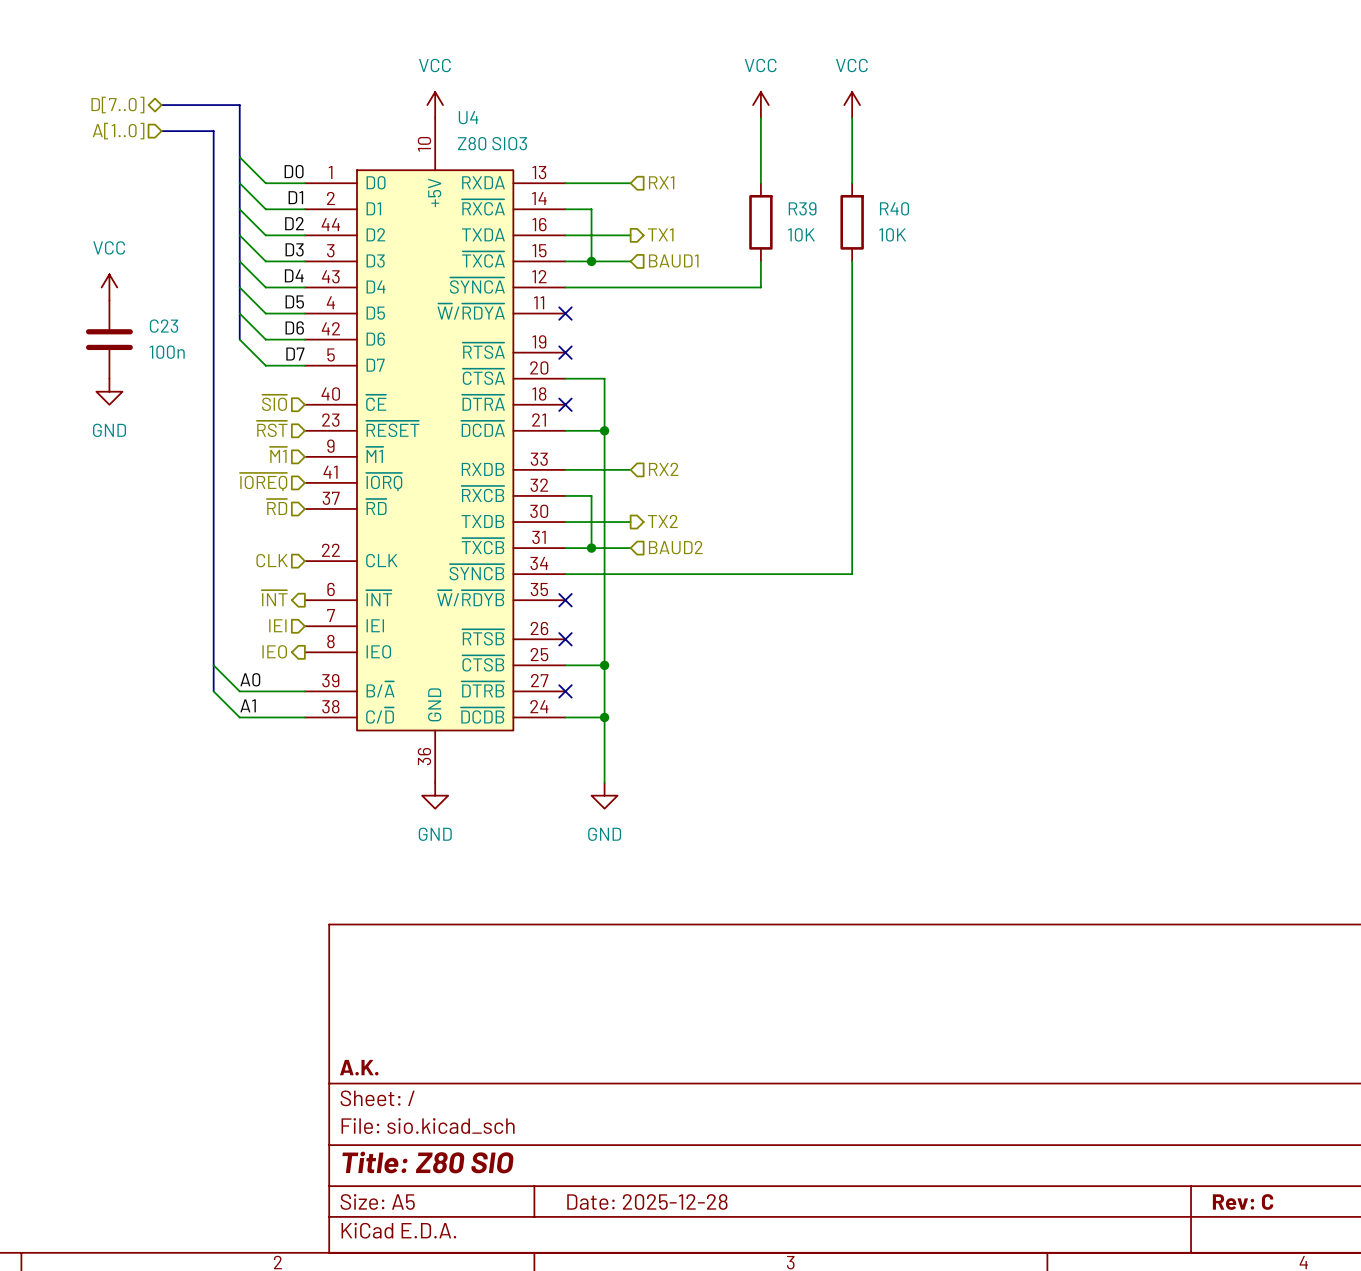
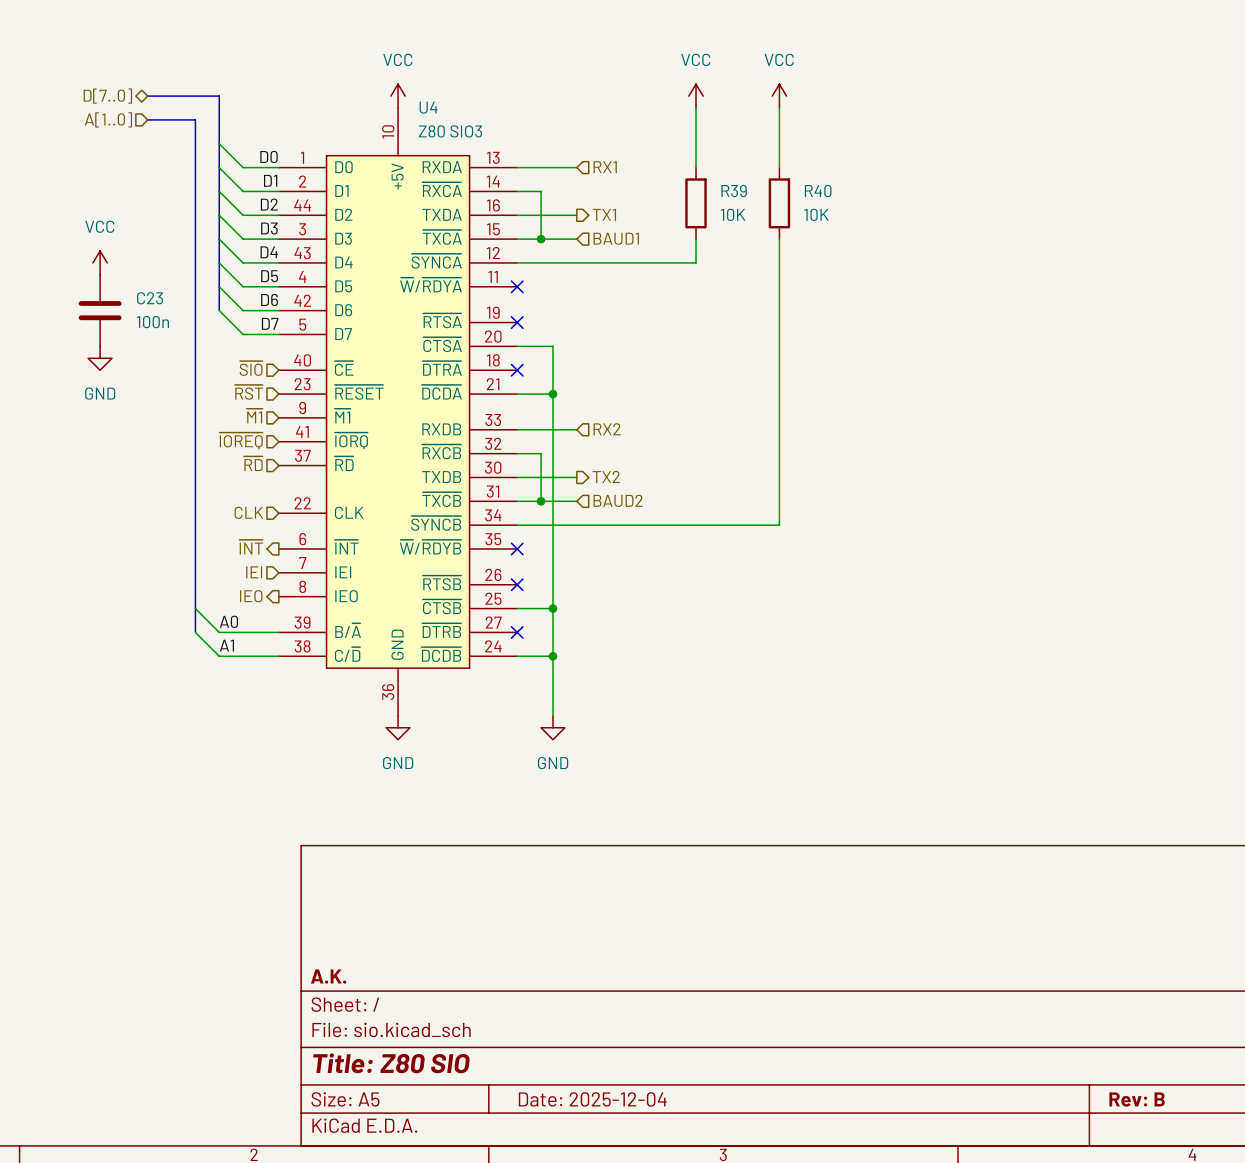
title block: Date: 2025-12-28 (647, 1201) -> Date: 2025-12-04 (592, 1099)
title block: Rev: C (1243, 1201) -> Rev: B (1137, 1099)

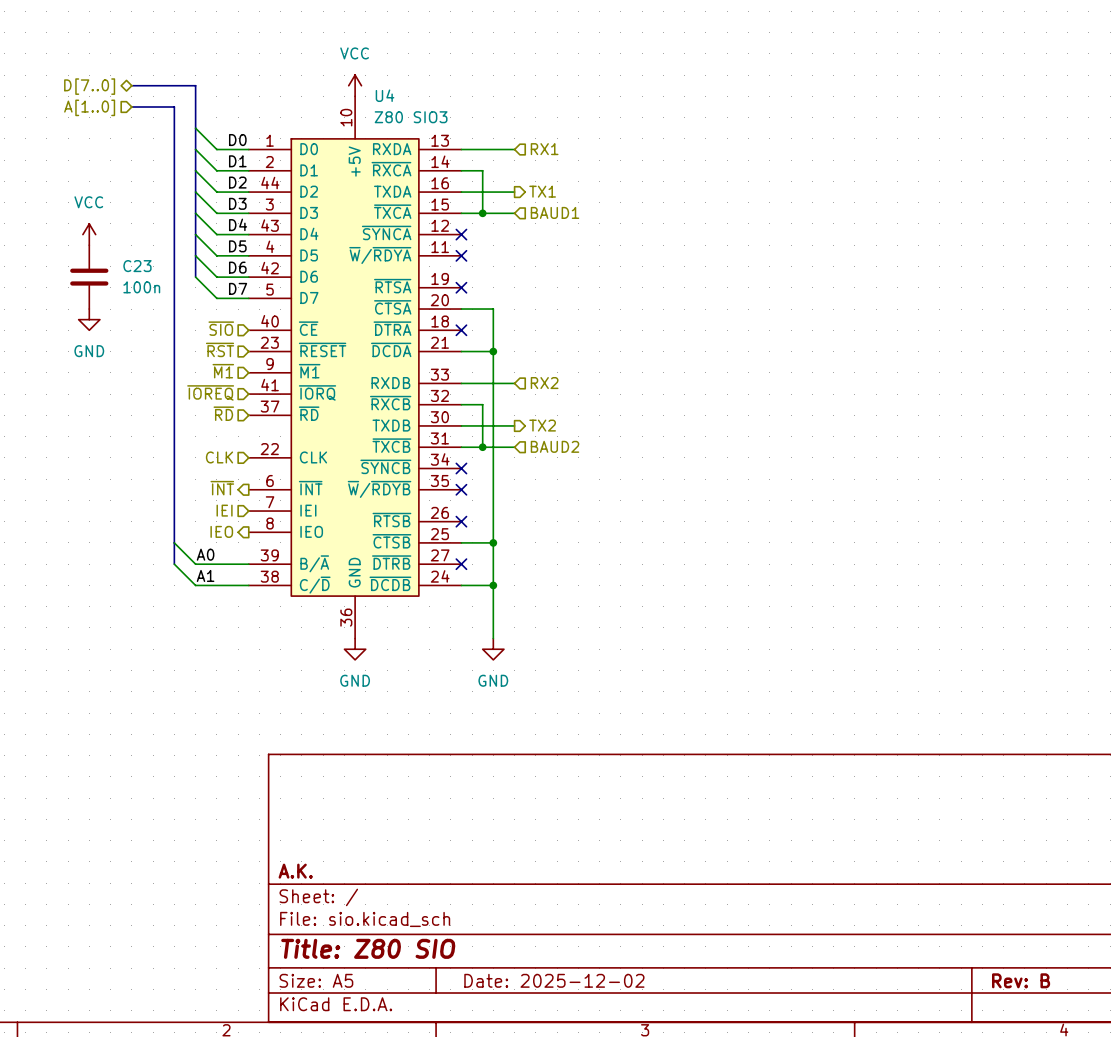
power symbol: VCC (696, 96) -> none
power symbol: VCC (779, 96) -> none
wire: (696, 108) (696, 167) -> none
wire: (779, 108) (779, 167) -> none
R39: 10K (696, 203) -> none
R40: 10K (779, 203) -> none
wire: (696, 239) (696, 262) (517, 262) -> none
wire: (779, 239) (779, 525) (517, 525) -> none
no-connect mark: none -> (461, 234)
no-connect mark: none -> (461, 468)
title block: Date: 2025-12-04 (592, 1099) -> Date: 2025-12-02 (554, 980)

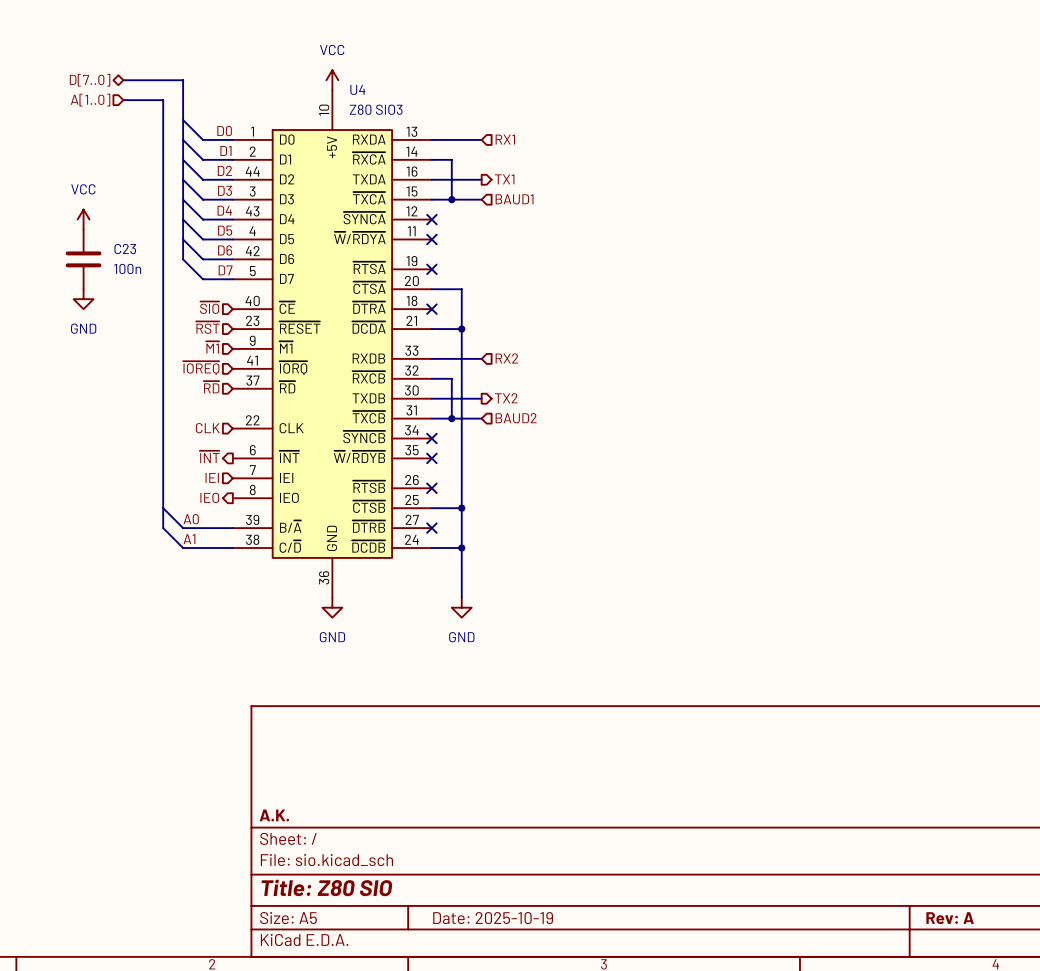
title block: Date: 2025-12-02 (554, 980) -> Date: 2025-10-19 (493, 918)
title block: Rev: B (1021, 980) -> Rev: A (950, 918)

